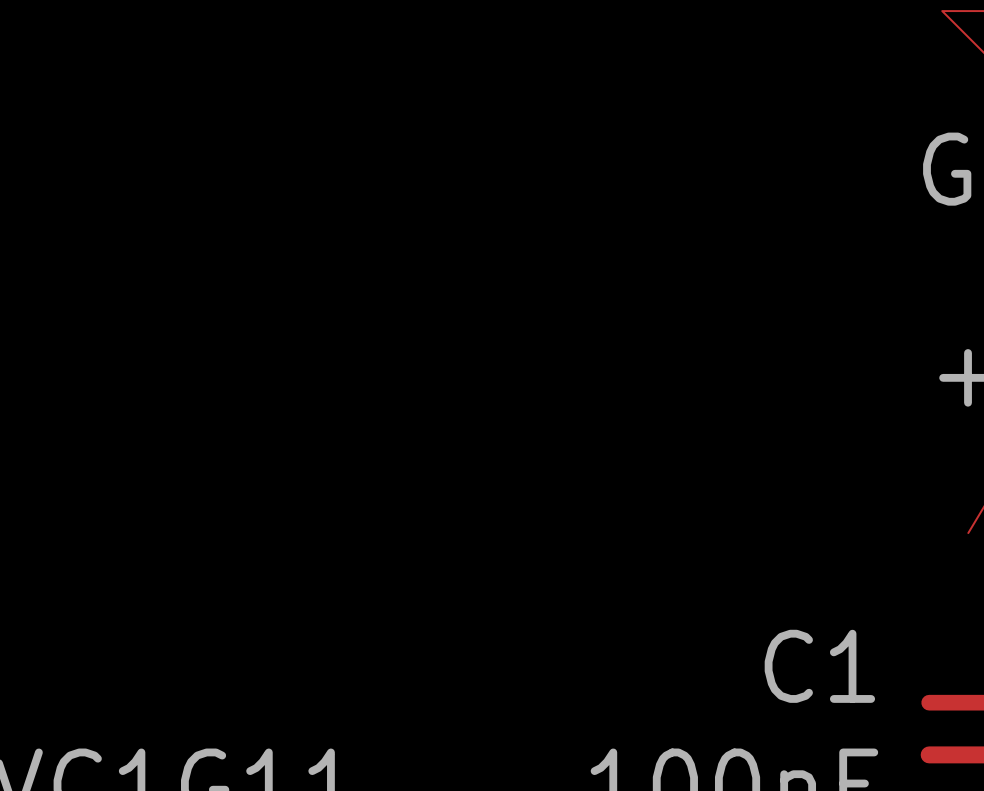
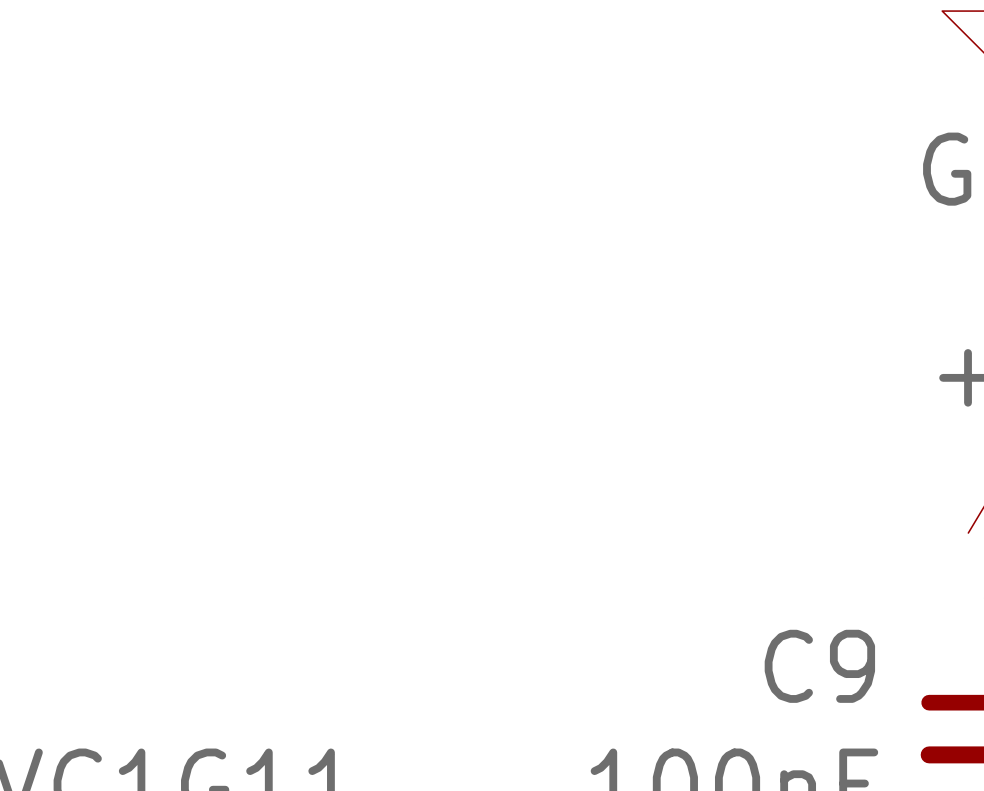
C1 name: C1 (819, 666) -> C9 (819, 666)

